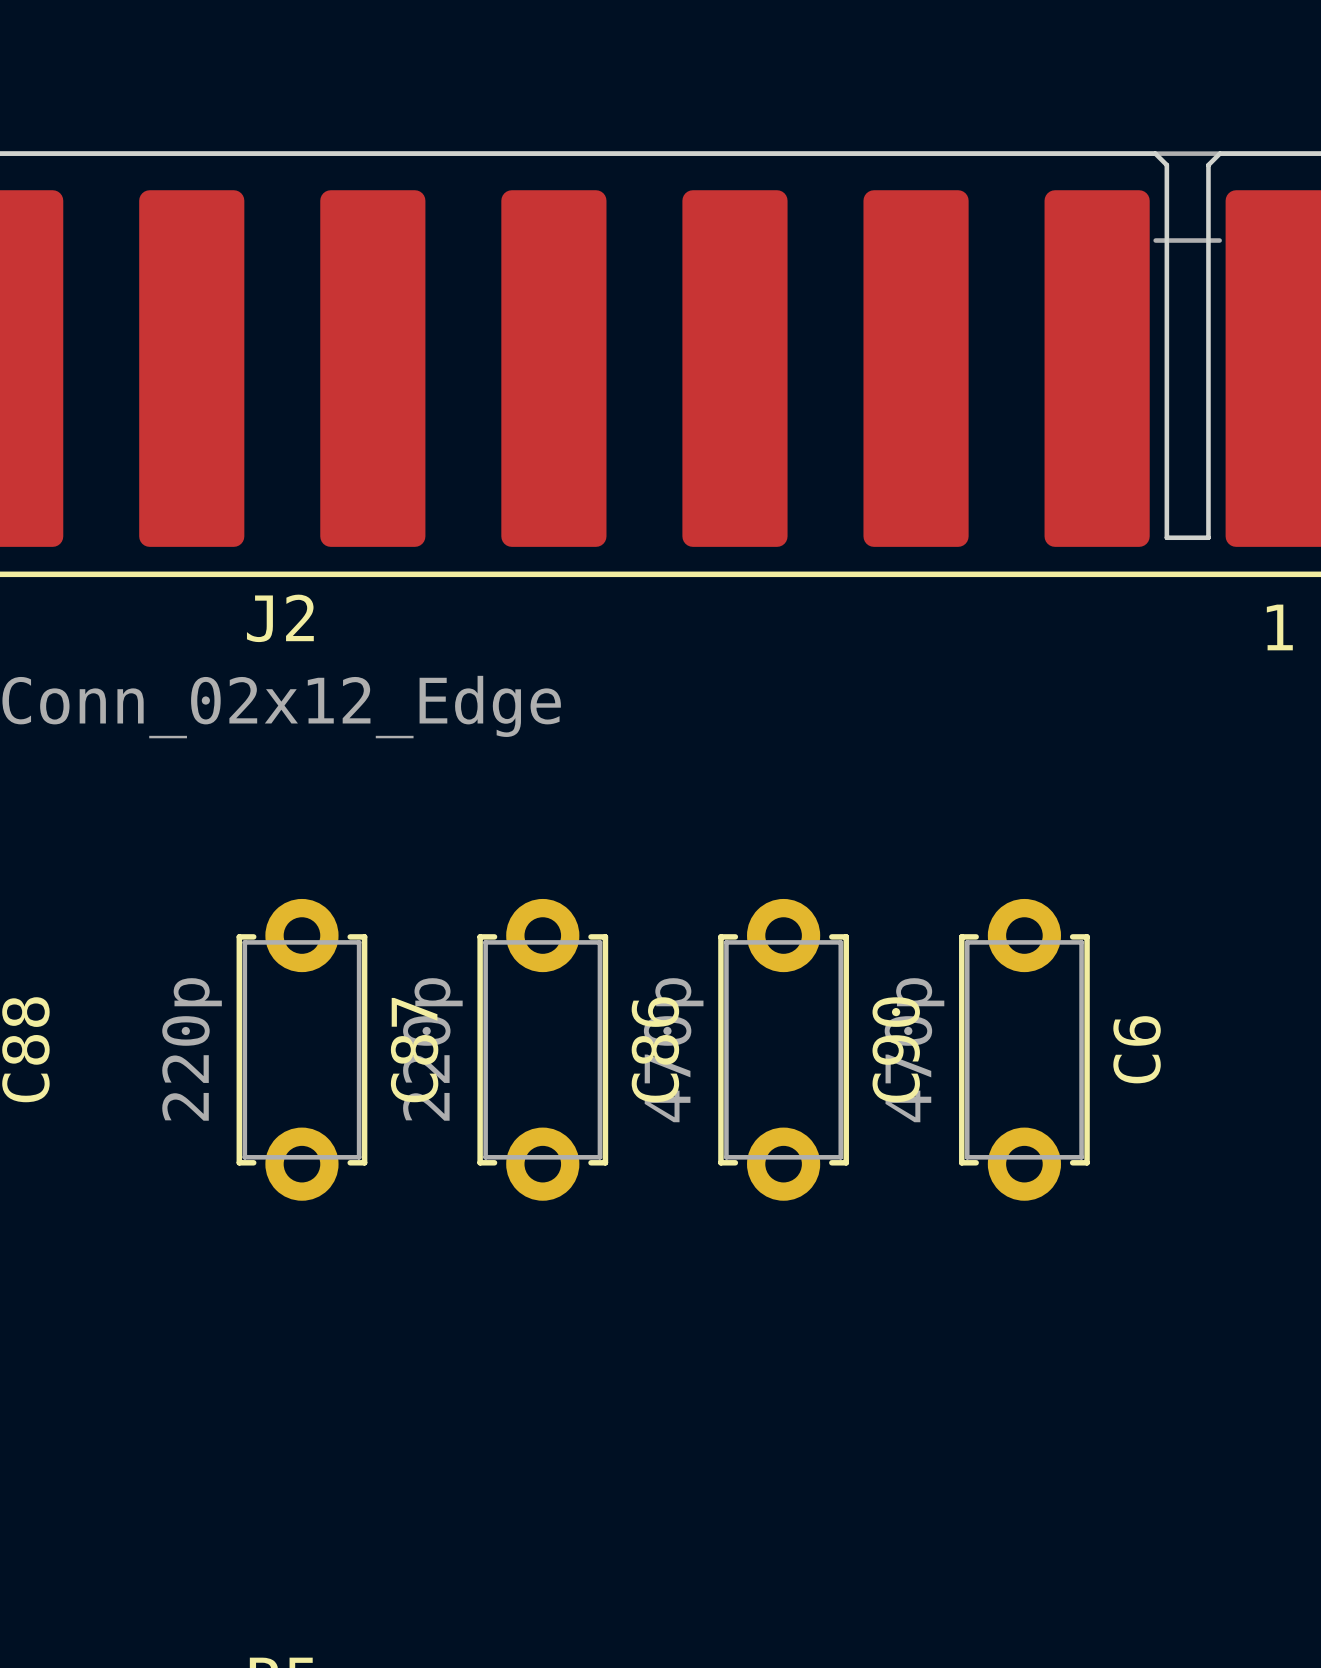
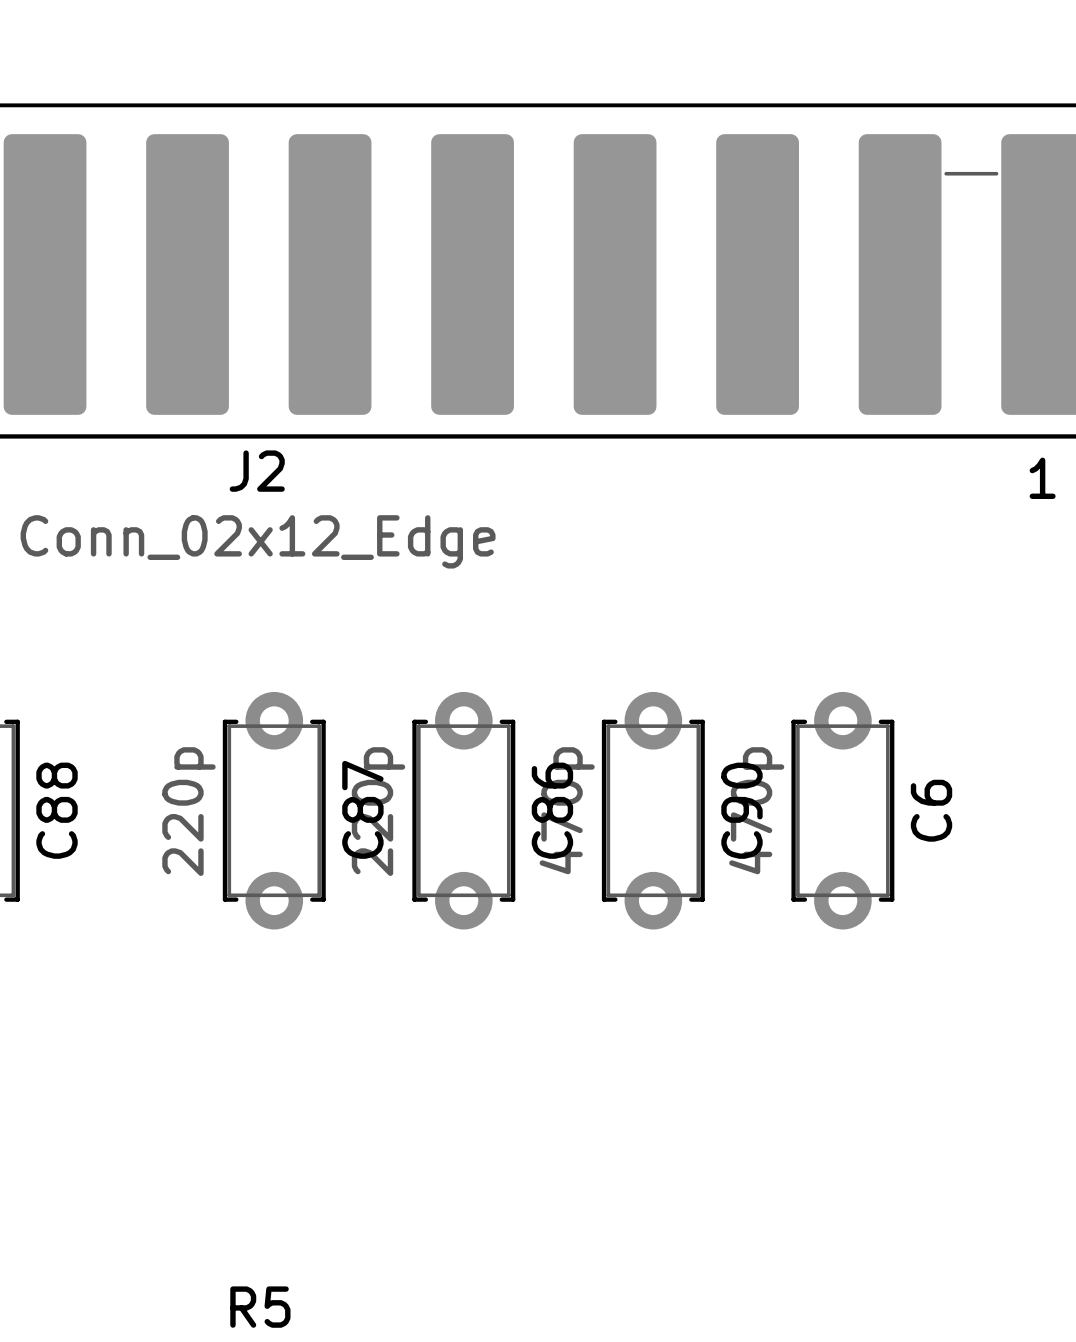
board edge: (1155, 153) (1166, 165) (1166, 537) (1208, 537) (1208, 165) (1219, 153) -> (945, 105) (996, 105)

